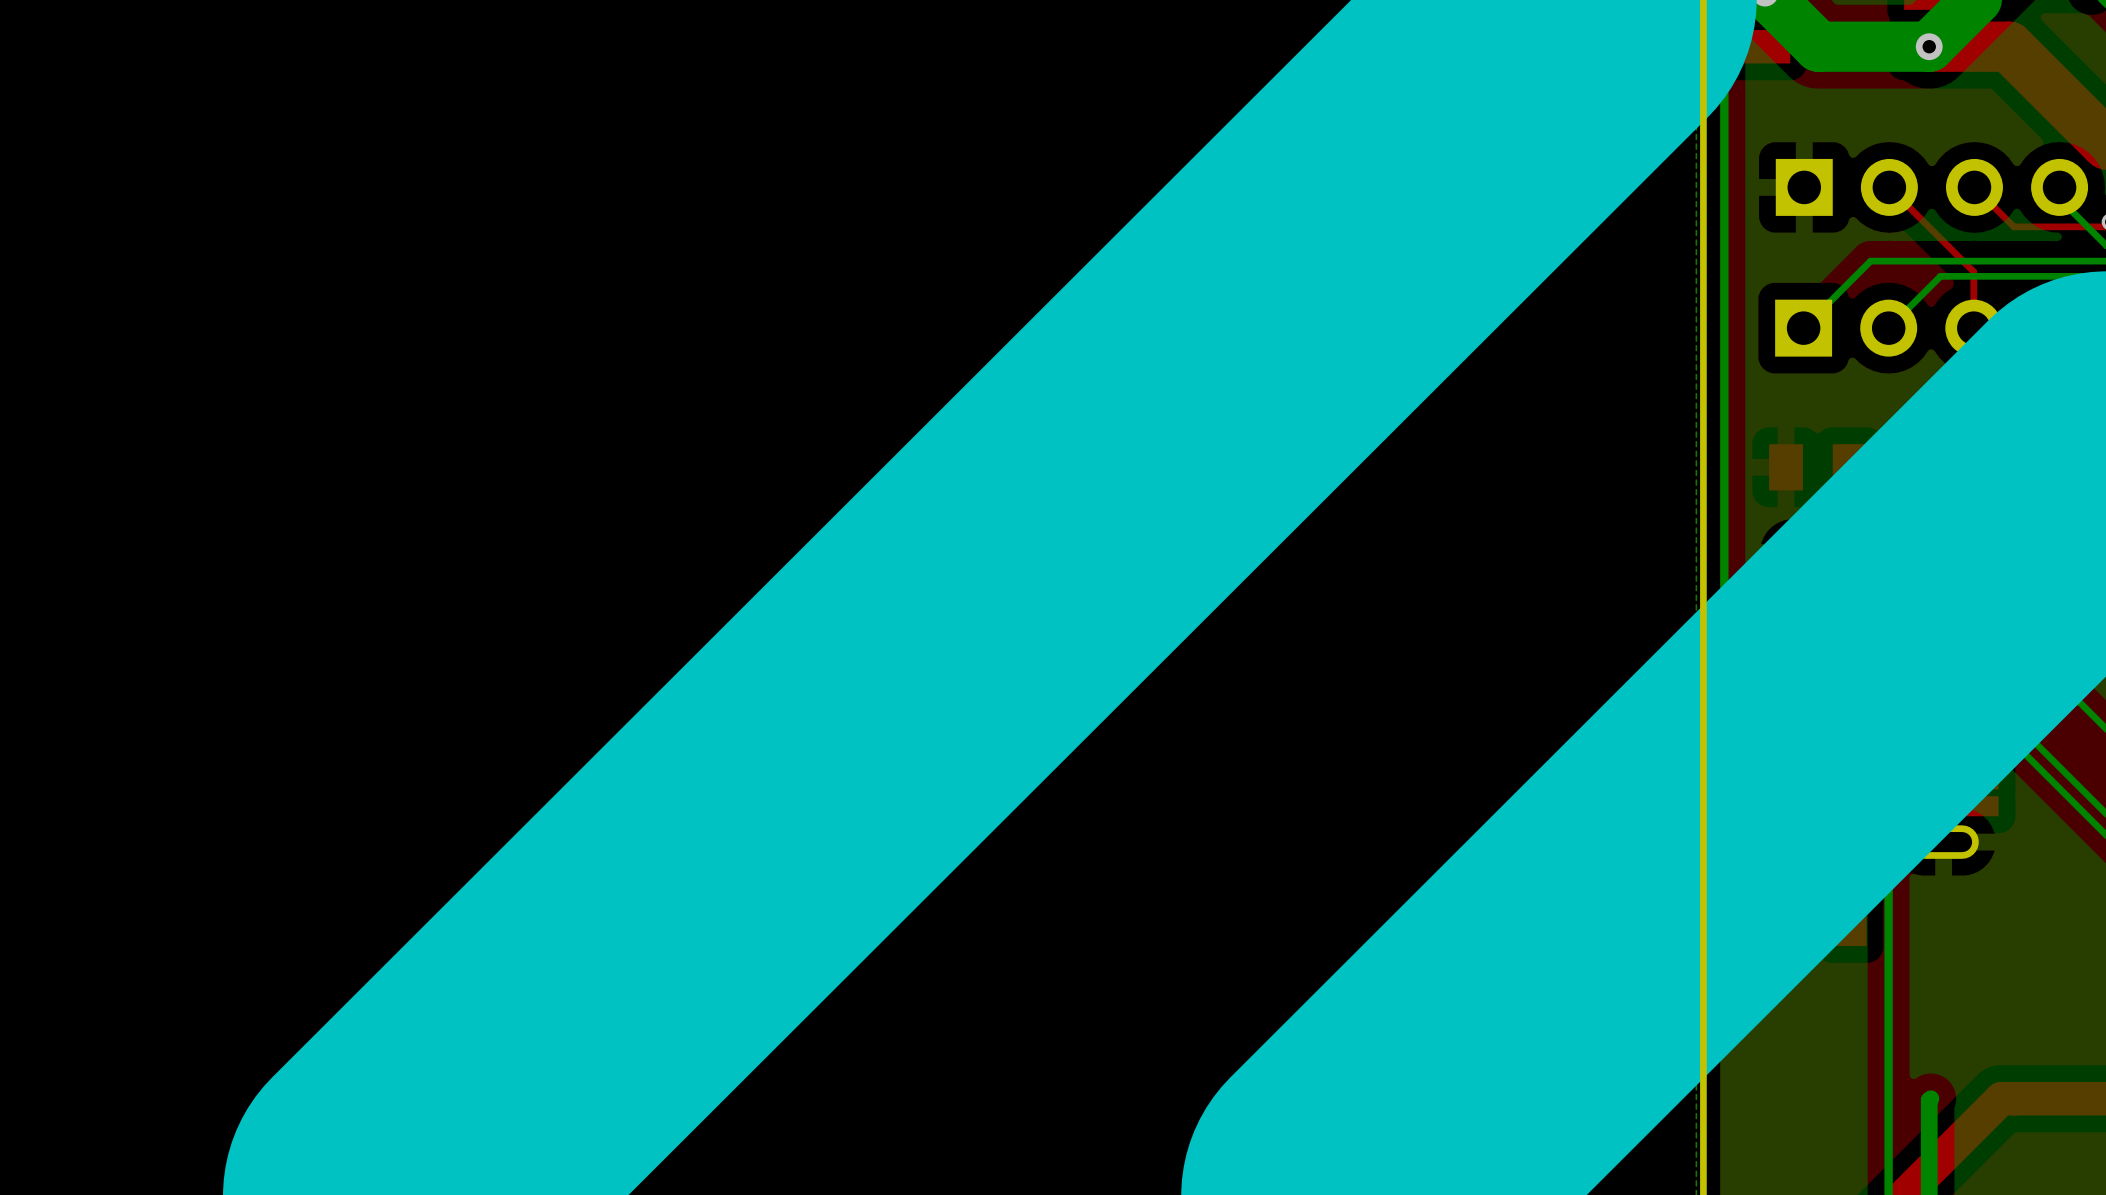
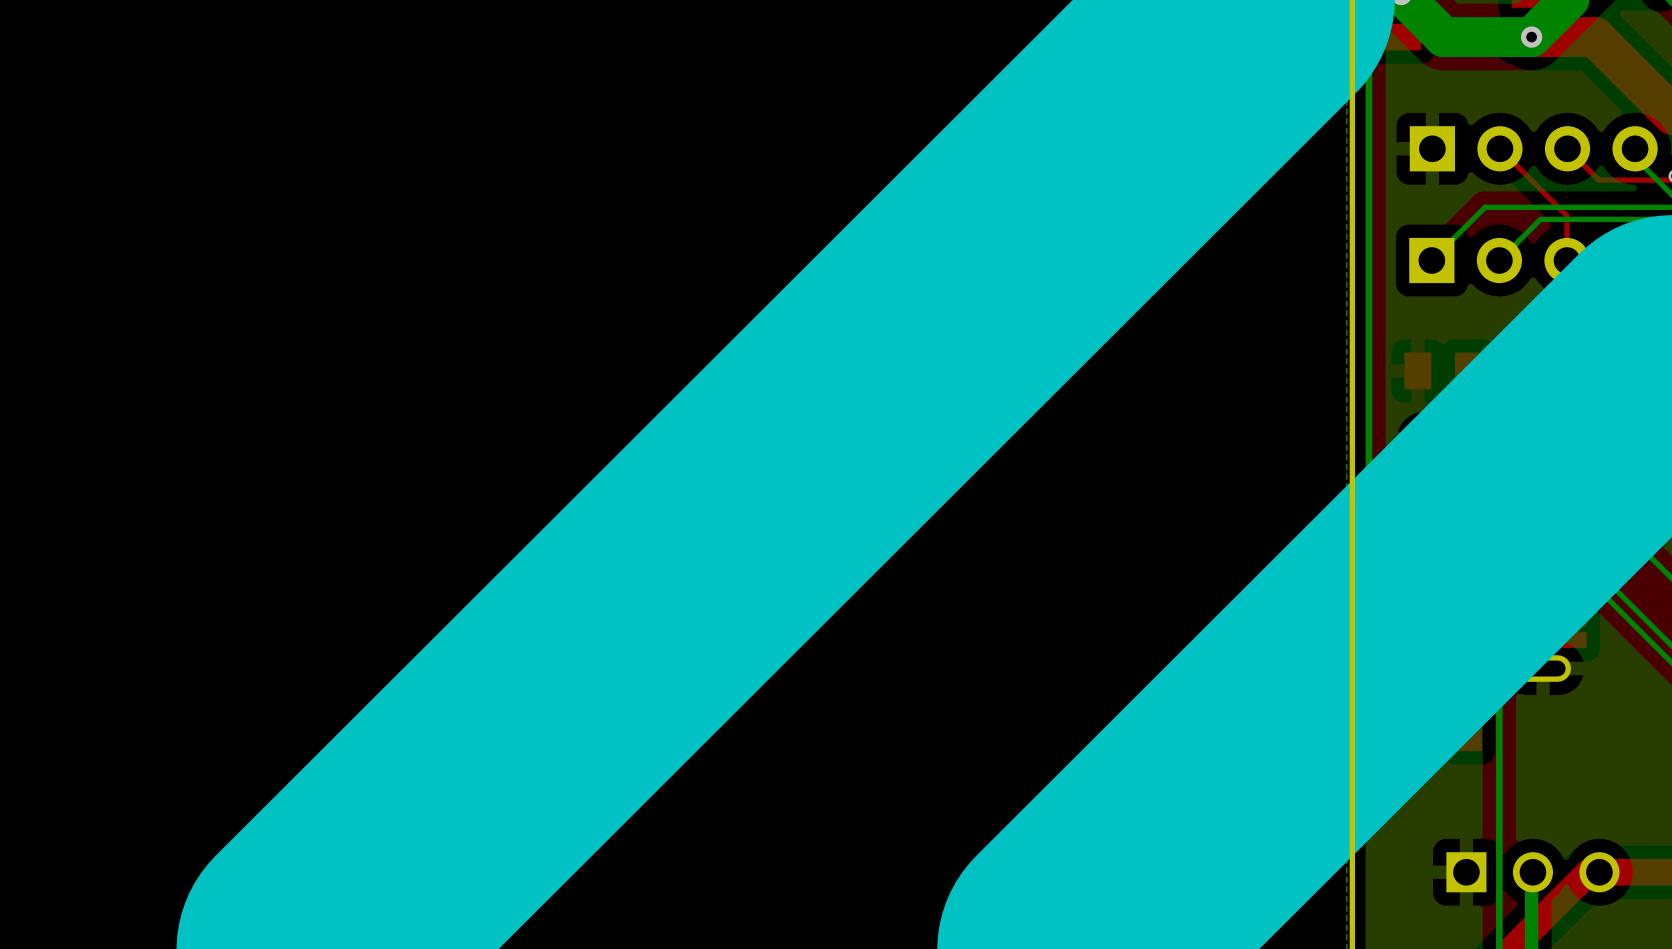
part: none -> (1532, 872)

